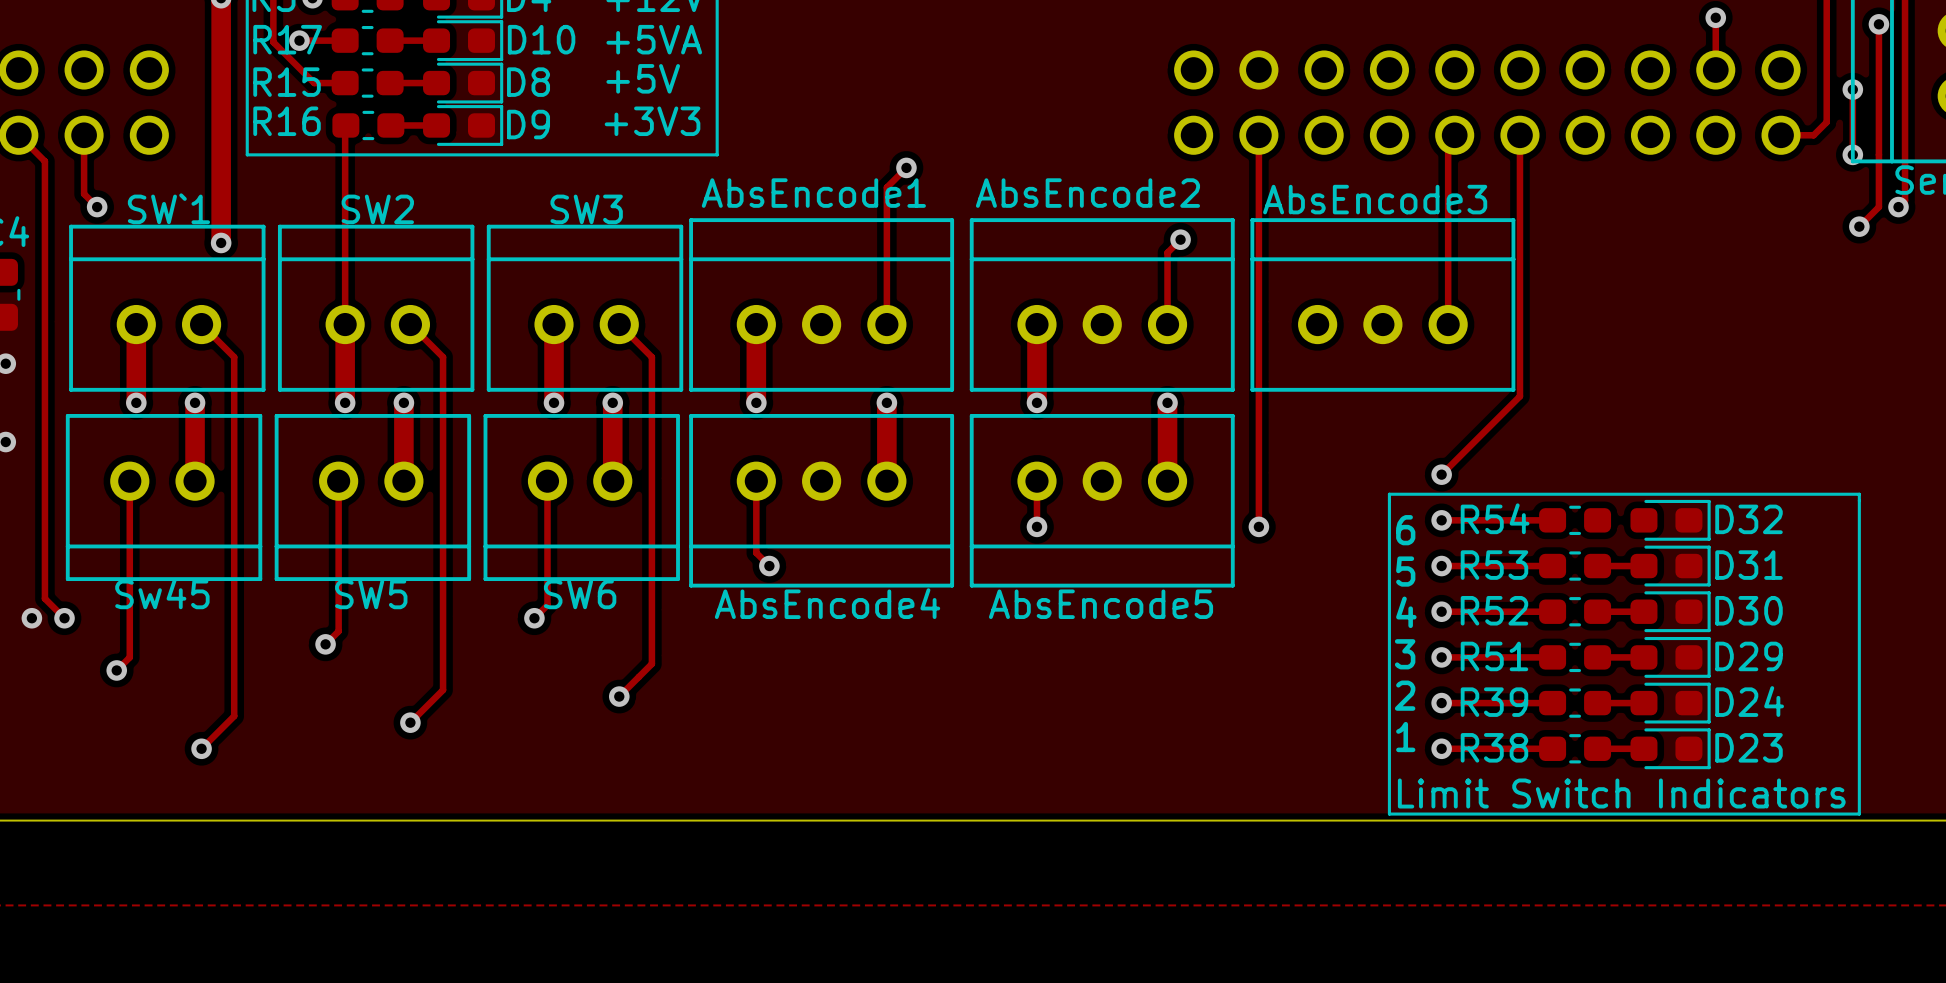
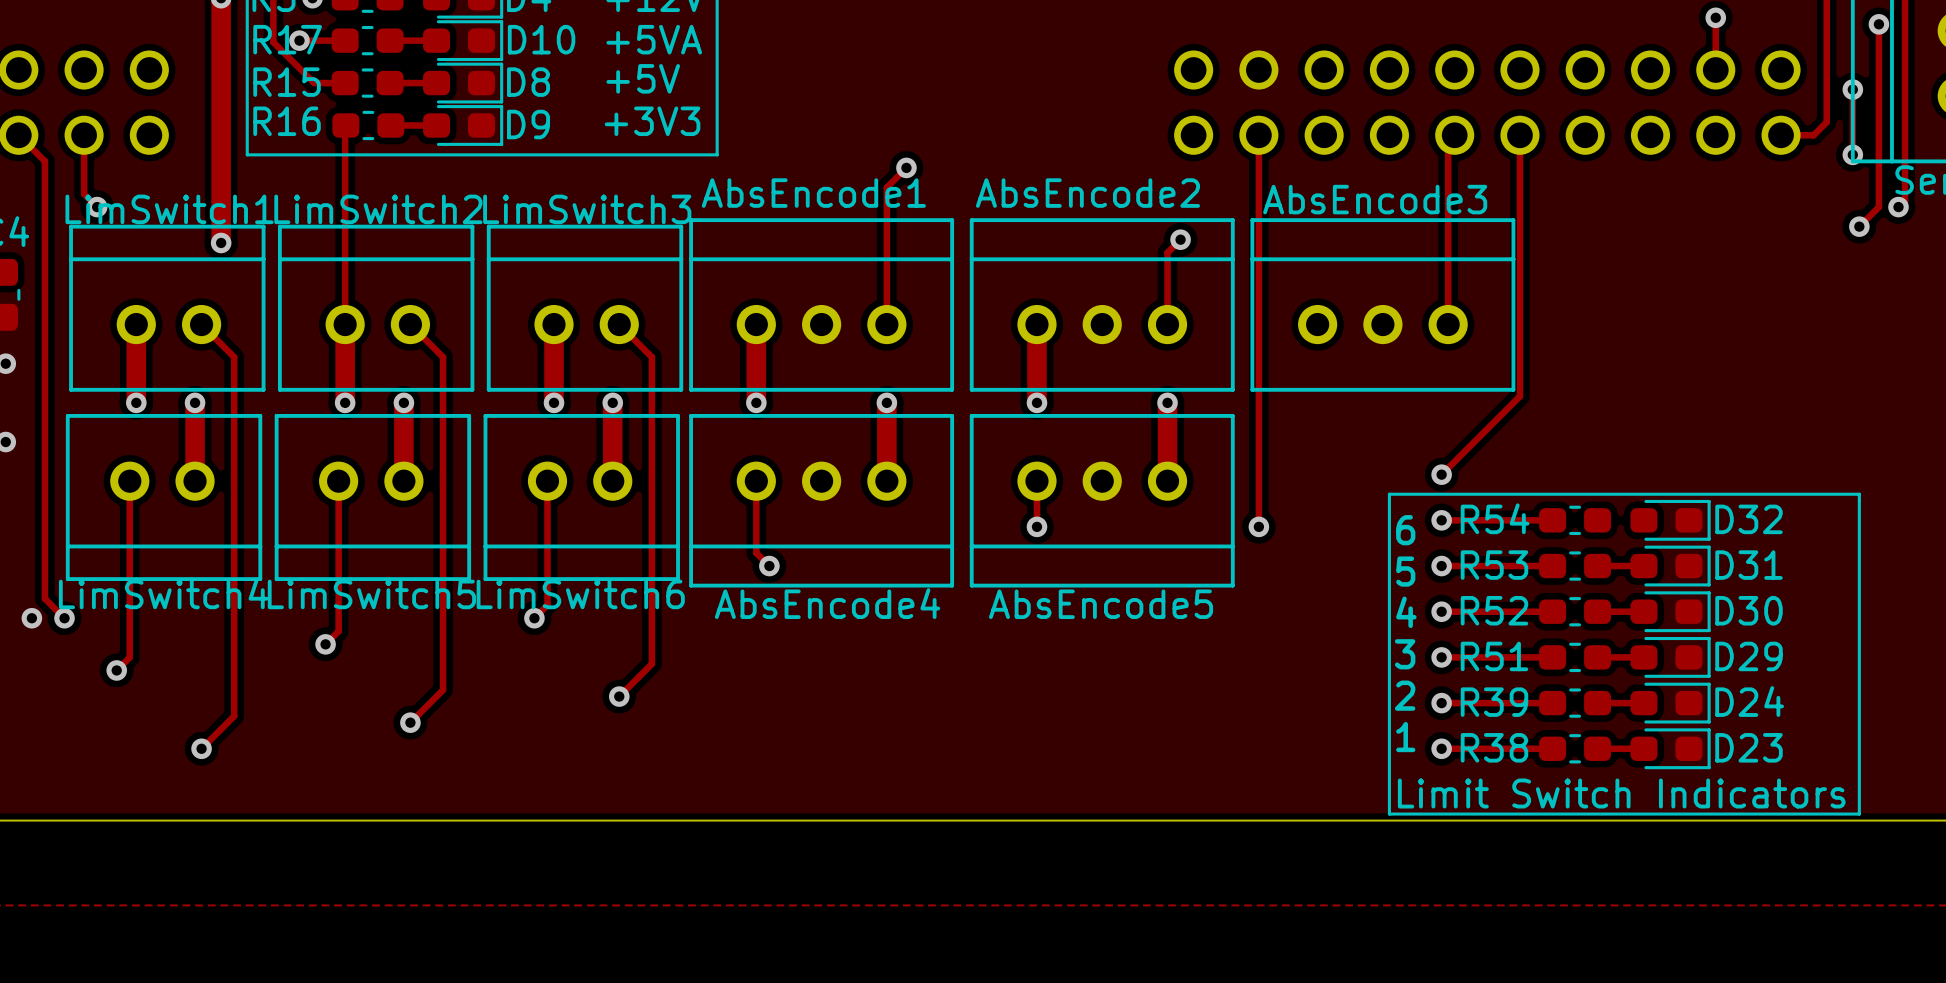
SW`1 name: SW`1 (168, 208) -> LimSwitch1 (169, 209)
SW2 name: SW2 (377, 209) -> LimSwitch2 (378, 209)
SW3 name: SW3 (586, 209) -> LimSwitch3 (587, 209)
Sw45 name: Sw45 (162, 593) -> LimSwitch4 (163, 593)
SW5 name: SW5 (371, 594) -> LimSwitch5 (371, 594)
SW6 name: SW6 (580, 594) -> LimSwitch6 (580, 594)

